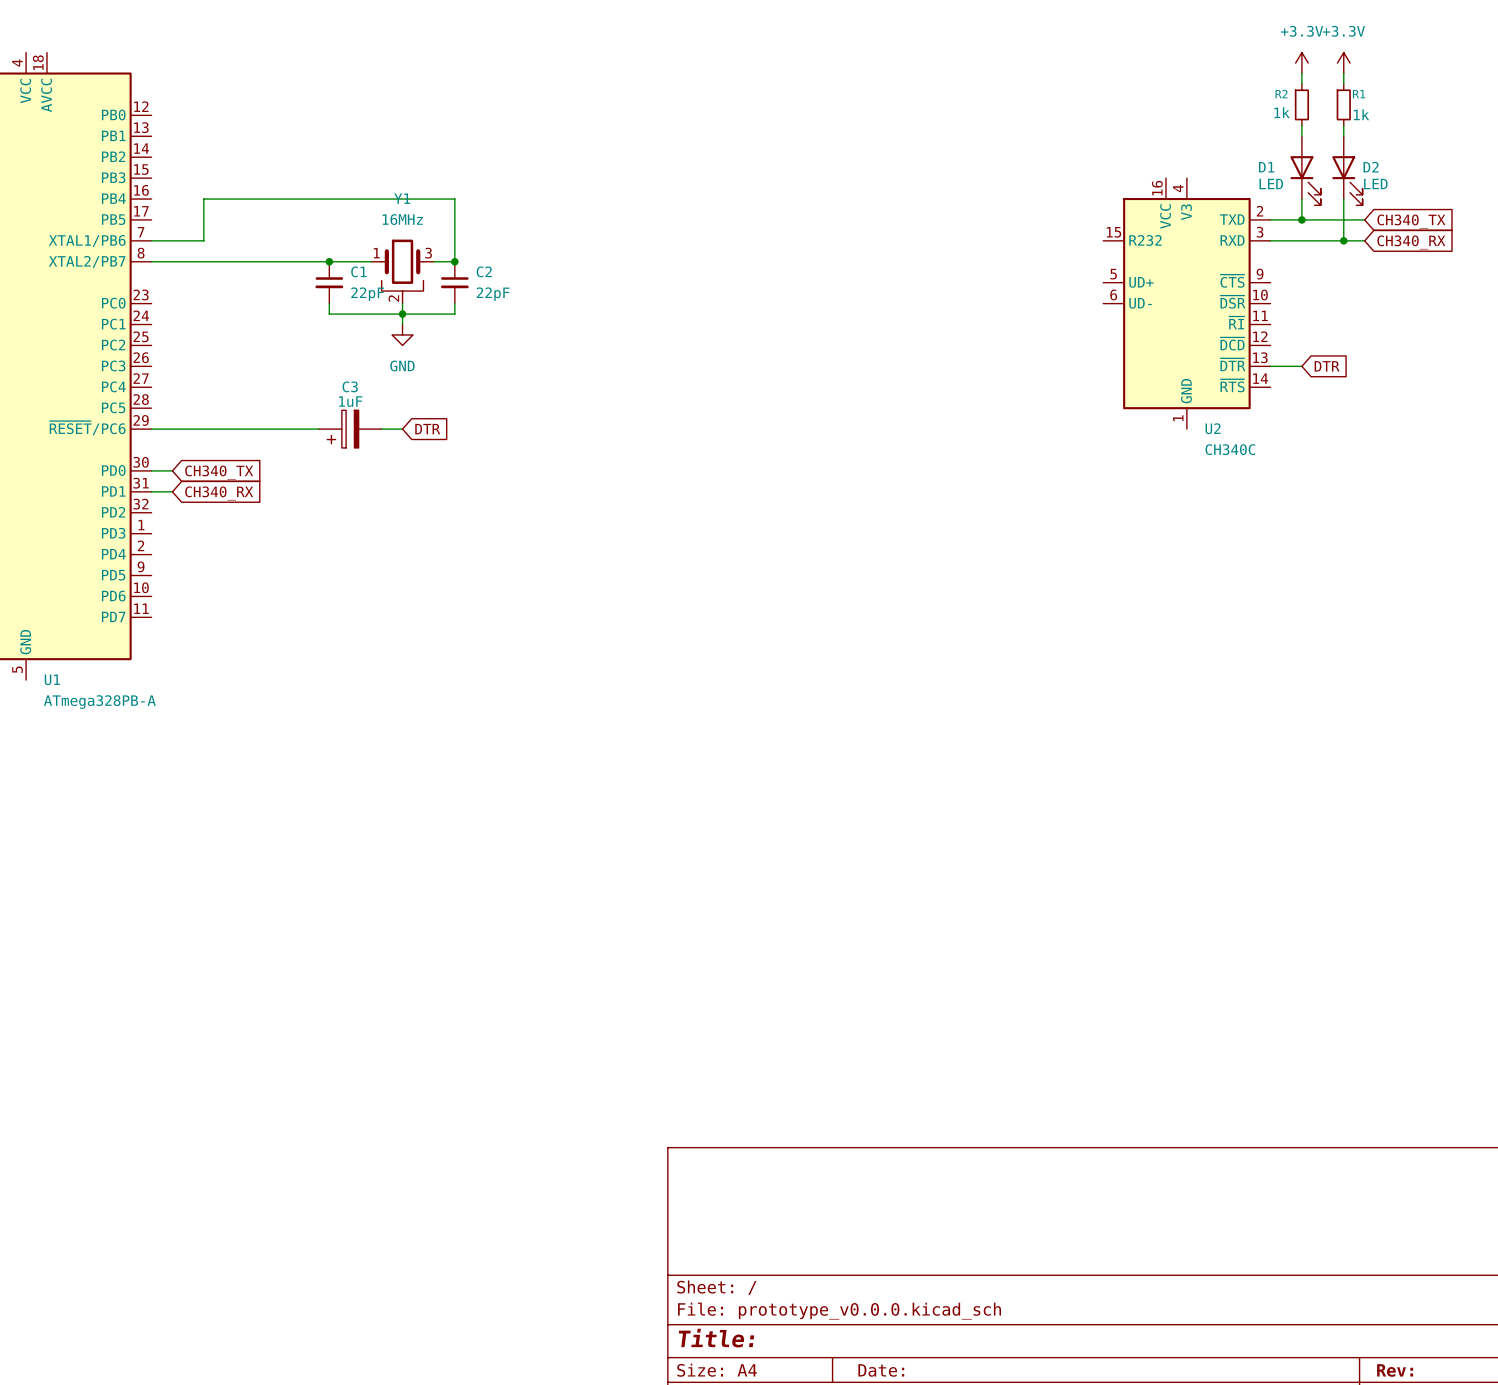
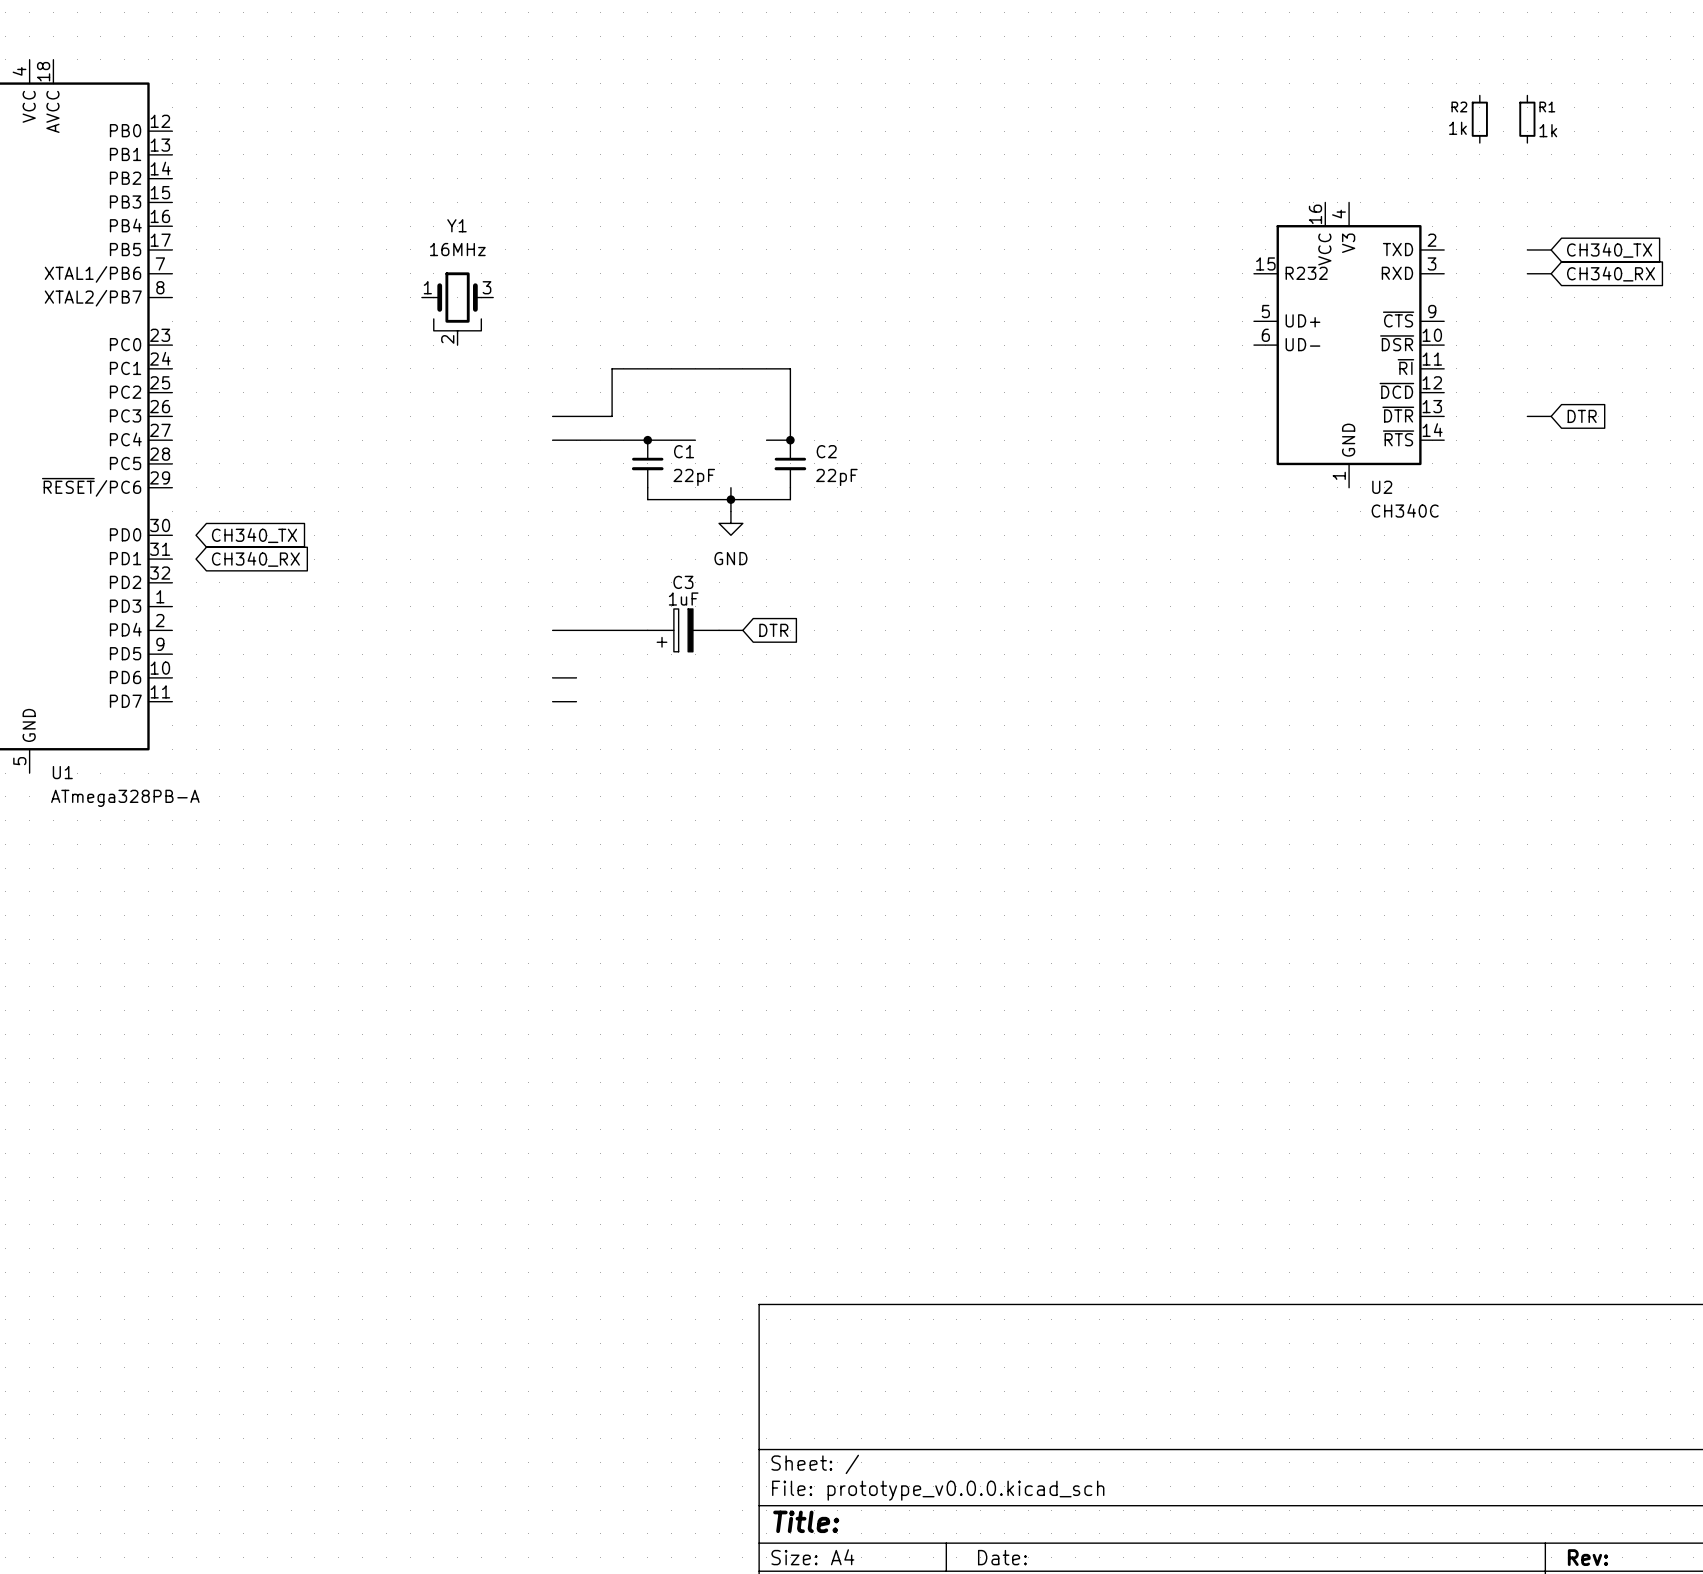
power symbol: +3.3V (1301, 63) -> none
power symbol: +3.3V (1343, 63) -> none
wire: (1301, 73) (1301, 83) -> none
wire: (1343, 73) (1343, 83) -> none
wire: (1301, 125) (1301, 136) -> none
wire: (1343, 125) (1343, 136) -> none
D1: LED (1305, 170) -> none
D2: LED (1347, 170) -> none
wire: (1301, 199) (1301, 219) -> none
wire: (1343, 199) (1343, 240) (1270, 240) -> none
wire: (1270, 219) (1343, 219) -> none
junction: (1301, 219) -> none
wire: (151, 240) (203, 240) (203, 199) (454, 199) (454, 261) (433, 261) -> none
junction: (1343, 240) -> none
wire: (151, 261) (371, 261) -> none
junction: (329, 261) -> none
junction: (454, 261) -> none
C1 position: (329, 282) -> (647, 463)
C2 position: (454, 282) -> (790, 463)
wire: (329, 303) (329, 314) (454, 314) (454, 303) -> none
wire: (402, 303) (402, 324) -> none
junction: (402, 314) -> none
power symbol: GND (402, 334) -> none
wire: none -> (552, 416) (612, 416) (612, 368) (790, 368) (790, 440) (766, 440)
wire: (1270, 366) (1301, 366) -> none
global label position: DTR (1327, 366) -> DTR (1582, 416)
wire: none -> (1527, 416) (1551, 416)
wire: none -> (552, 440) (695, 440)
junction: none -> (647, 440)
junction: none -> (790, 440)
wire: (151, 429) (318, 429) -> none
C3 position: (350, 429) -> (683, 630)
wire: (381, 429) (402, 429) -> (552, 677) (576, 677)
global label: DTR (427, 429) -> none
wire: none -> (647, 487) (647, 499) (790, 499) (790, 487)
wire: none -> (730, 487) (730, 511)
junction: none -> (730, 499)
power symbol: none -> GND (730, 523)
wire: (151, 470) (172, 470) -> none
wire: (151, 491) (172, 491) -> none
wire: none -> (552, 630) (647, 630)
wire: none -> (719, 630) (742, 630)
global label: none -> DTR (773, 630)
wire: none -> (552, 701) (576, 701)

